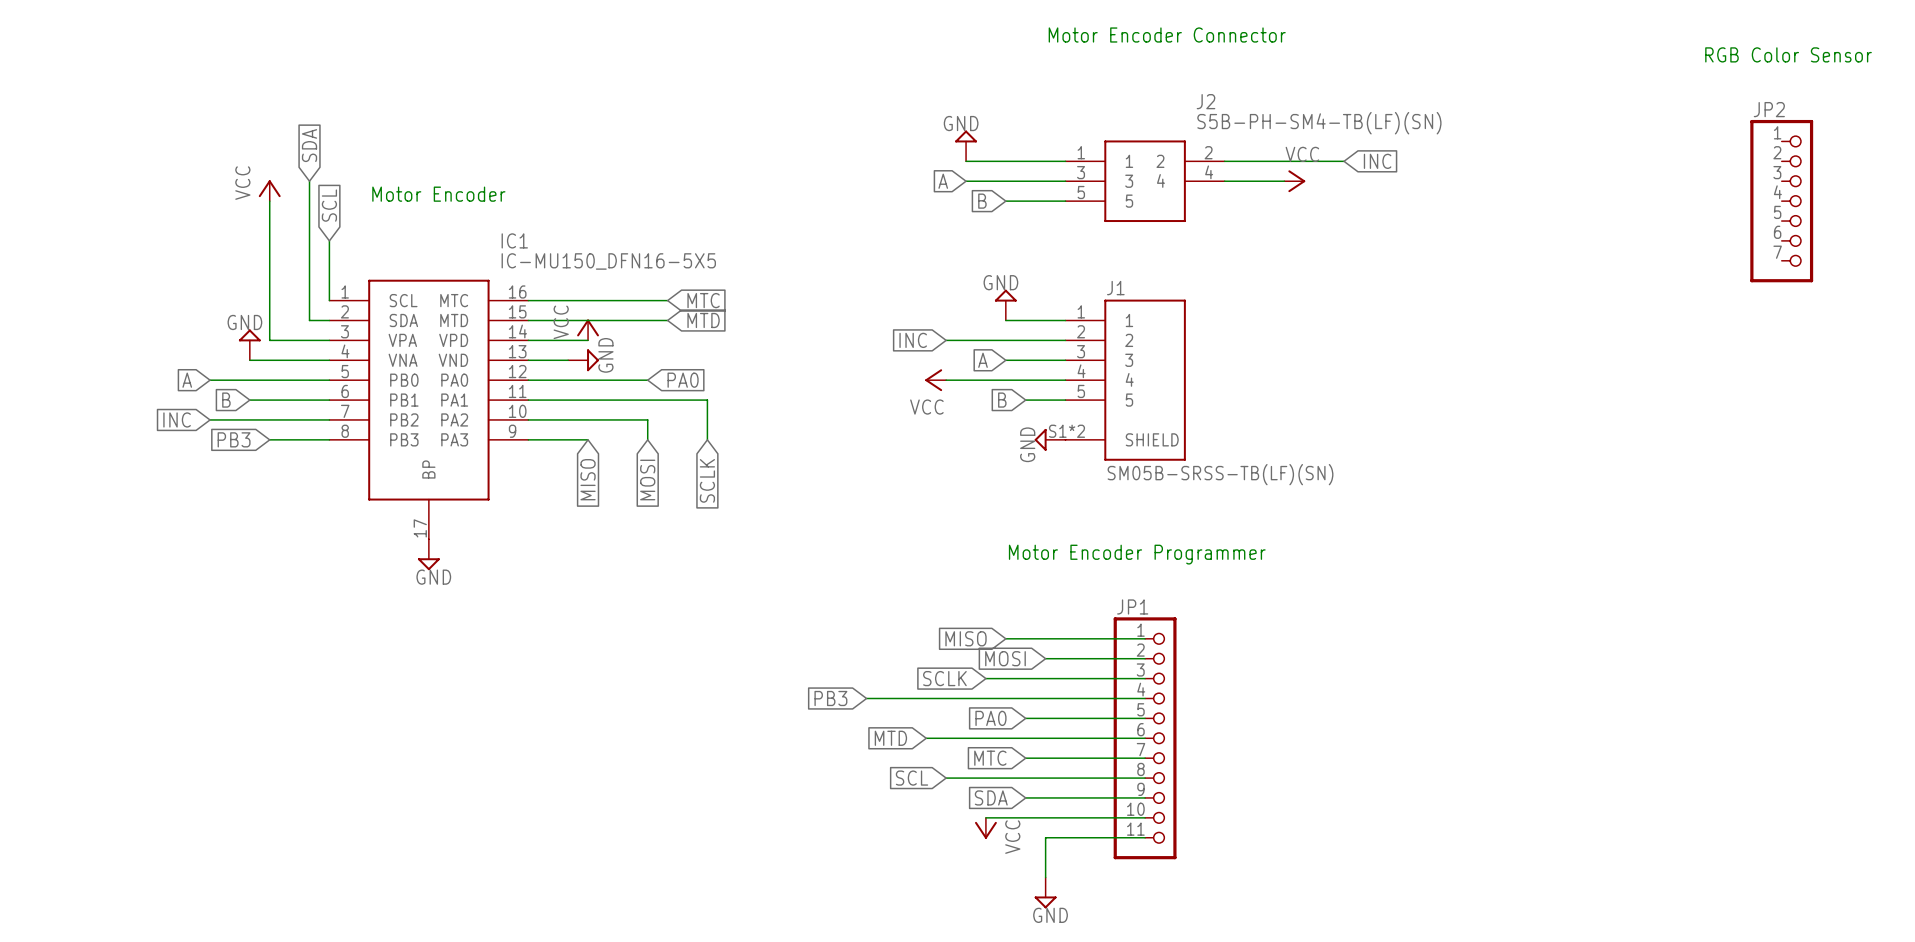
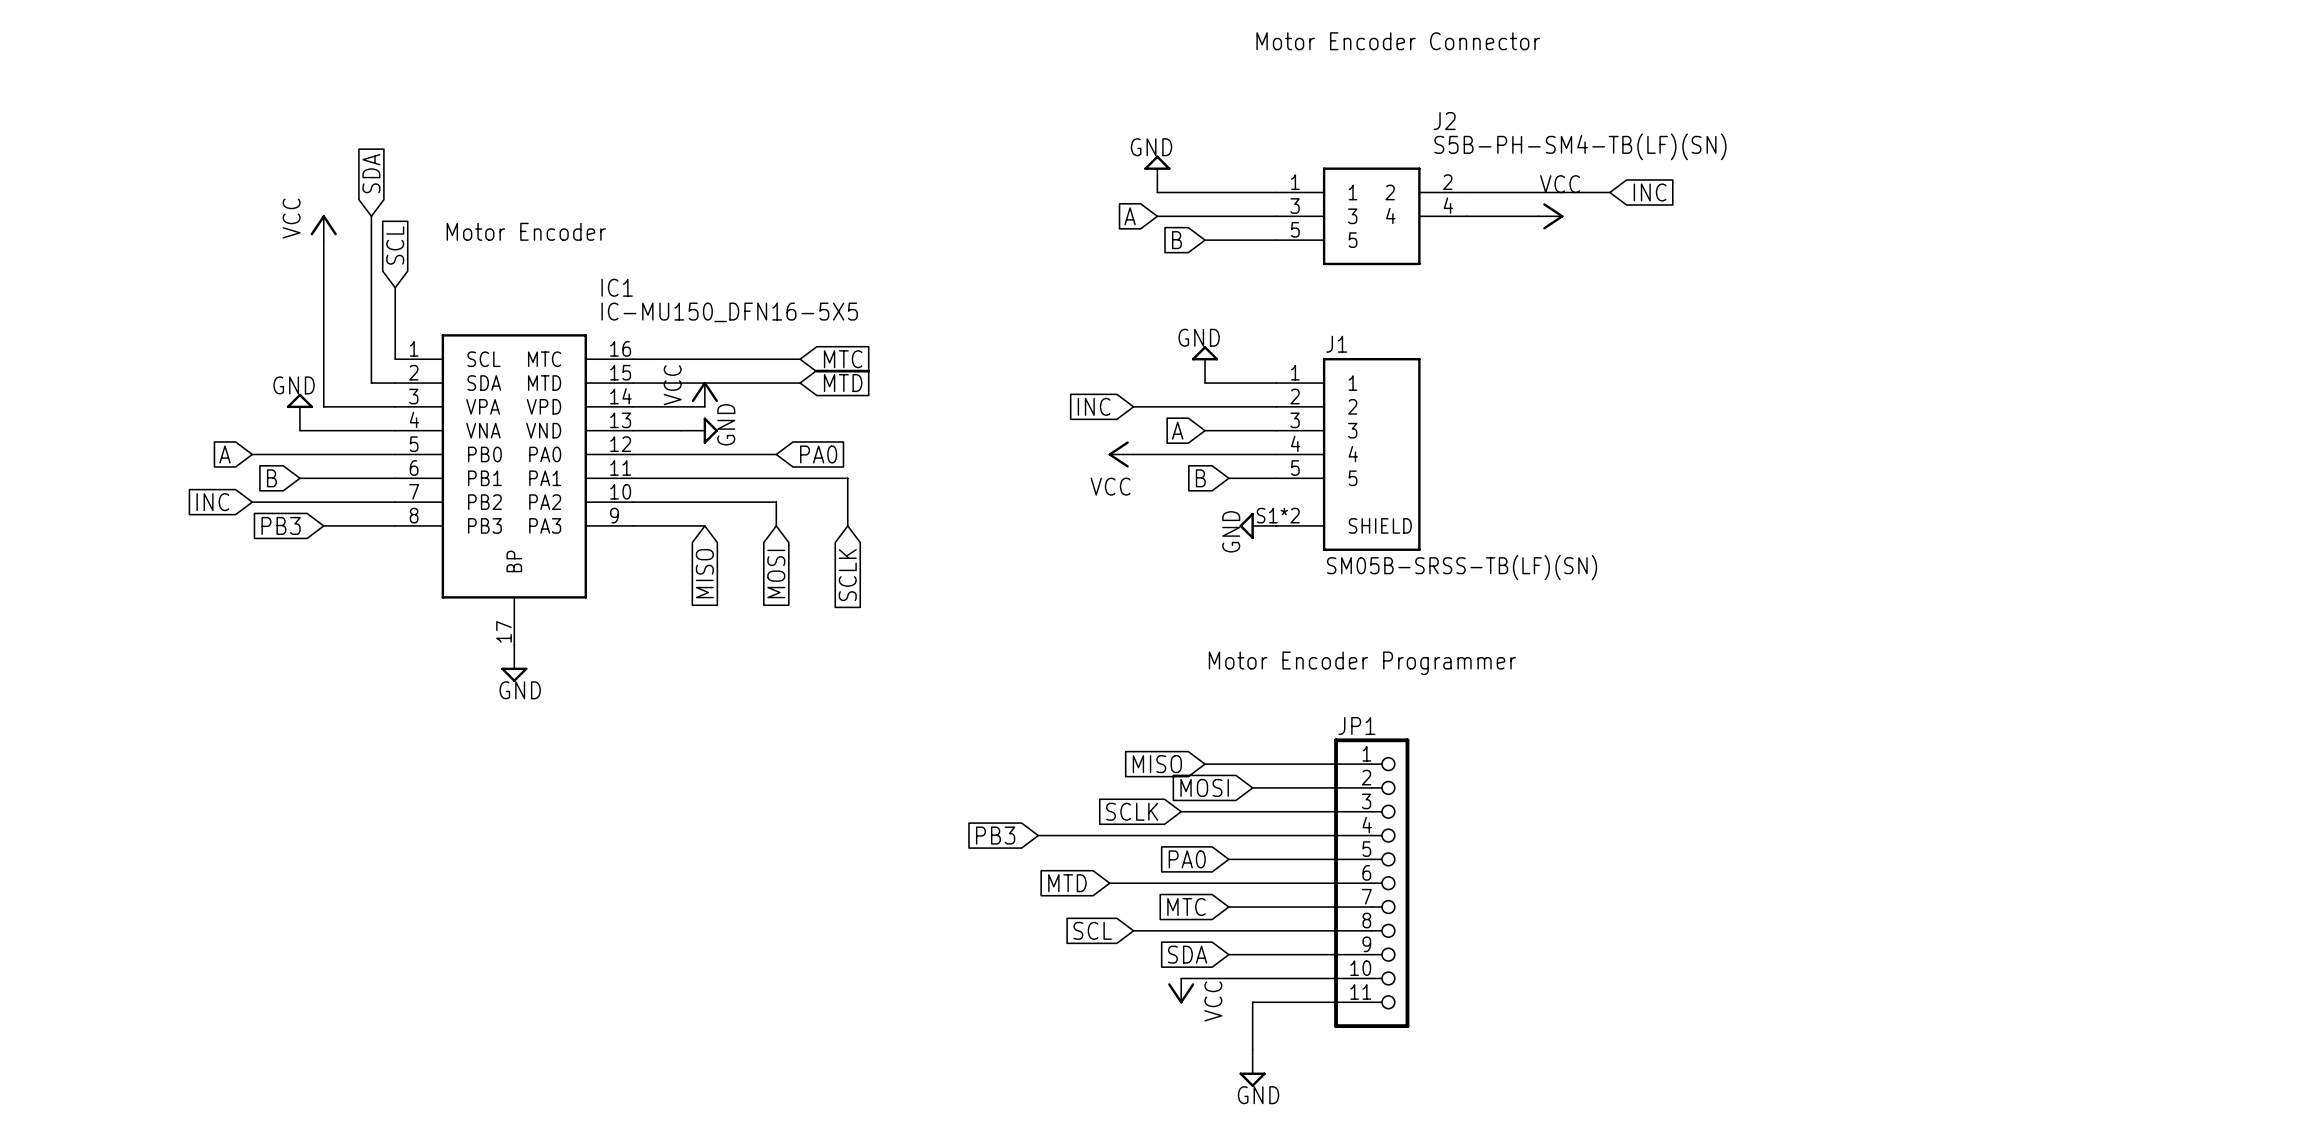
text: RGB Color Sensor (1788, 54) -> none
JP2: (1781, 201) -> none

